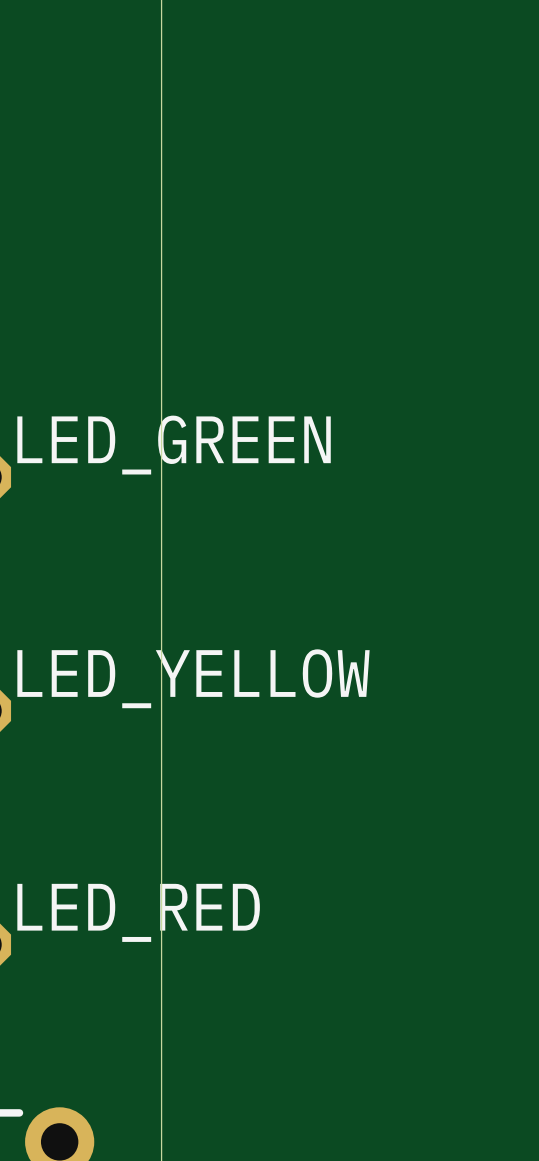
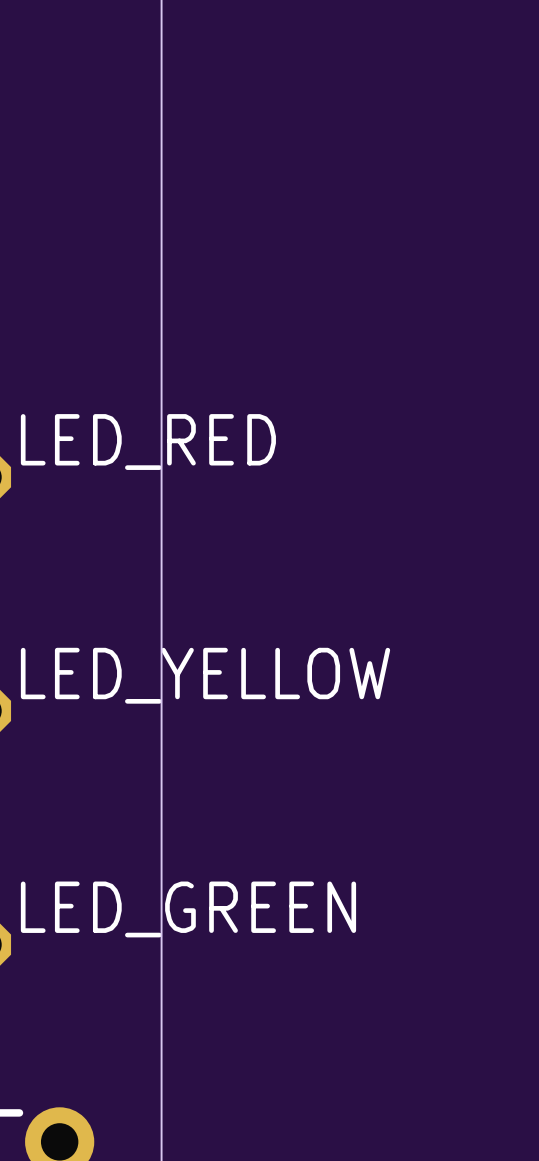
LED_GREEN name: LED_GREEN (174, 445) -> LED_RED (148, 442)
LED_RED name: LED_RED (138, 912) -> LED_GREEN (188, 909)

